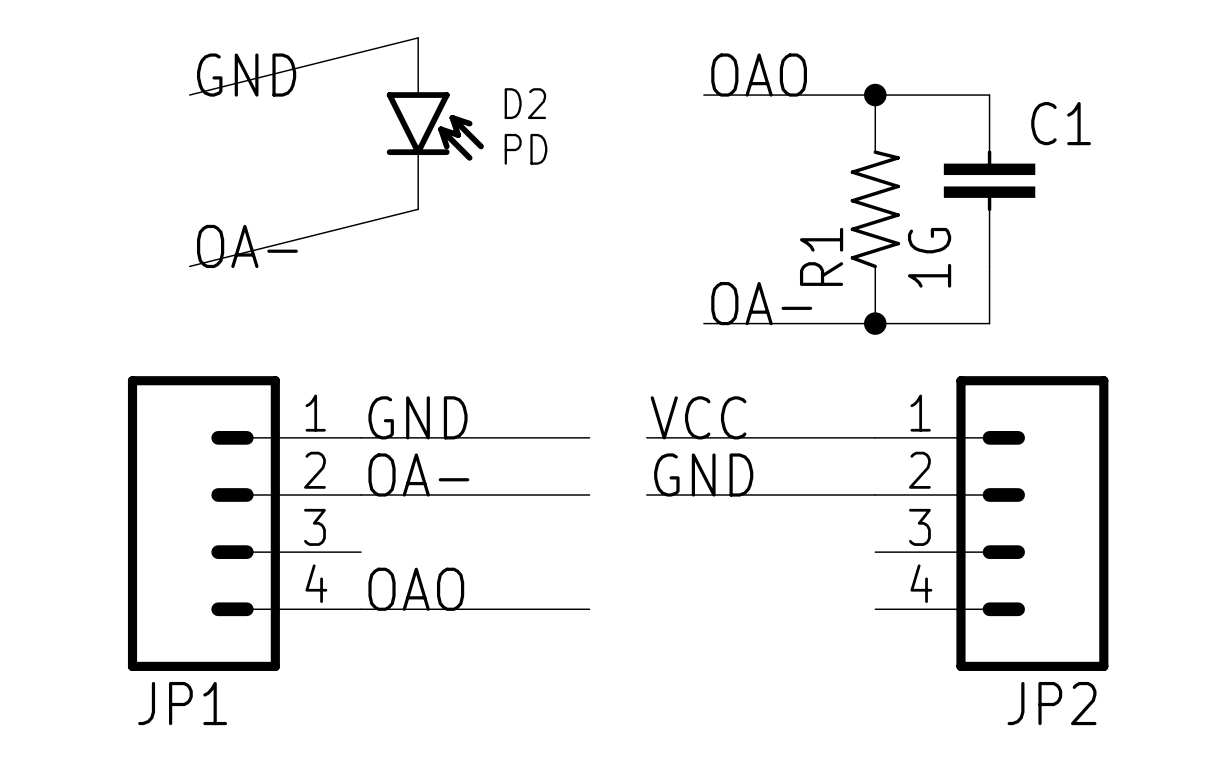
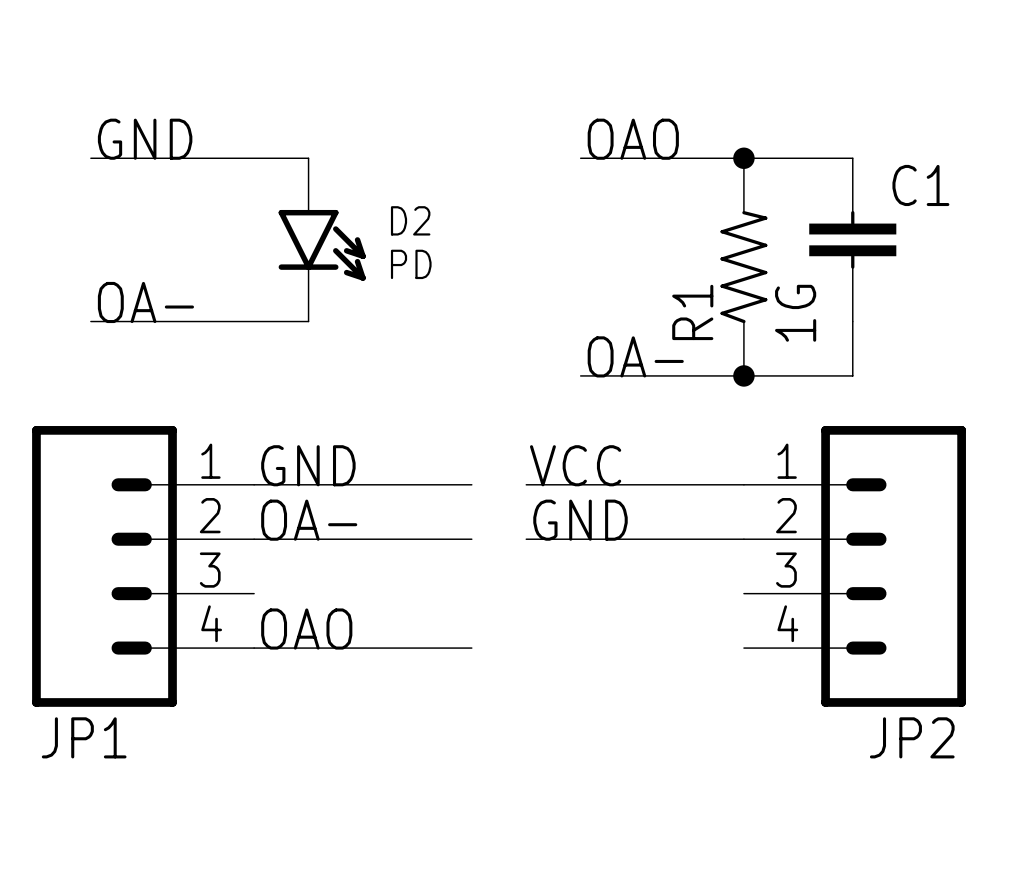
D2 symbol: [386, 37, 484, 210] -> [278, 158, 366, 322]
wire: (418, 37) (189, 95) -> (308, 158) (90, 158)
wire: (418, 209) (189, 266) -> (308, 321) (90, 321)

